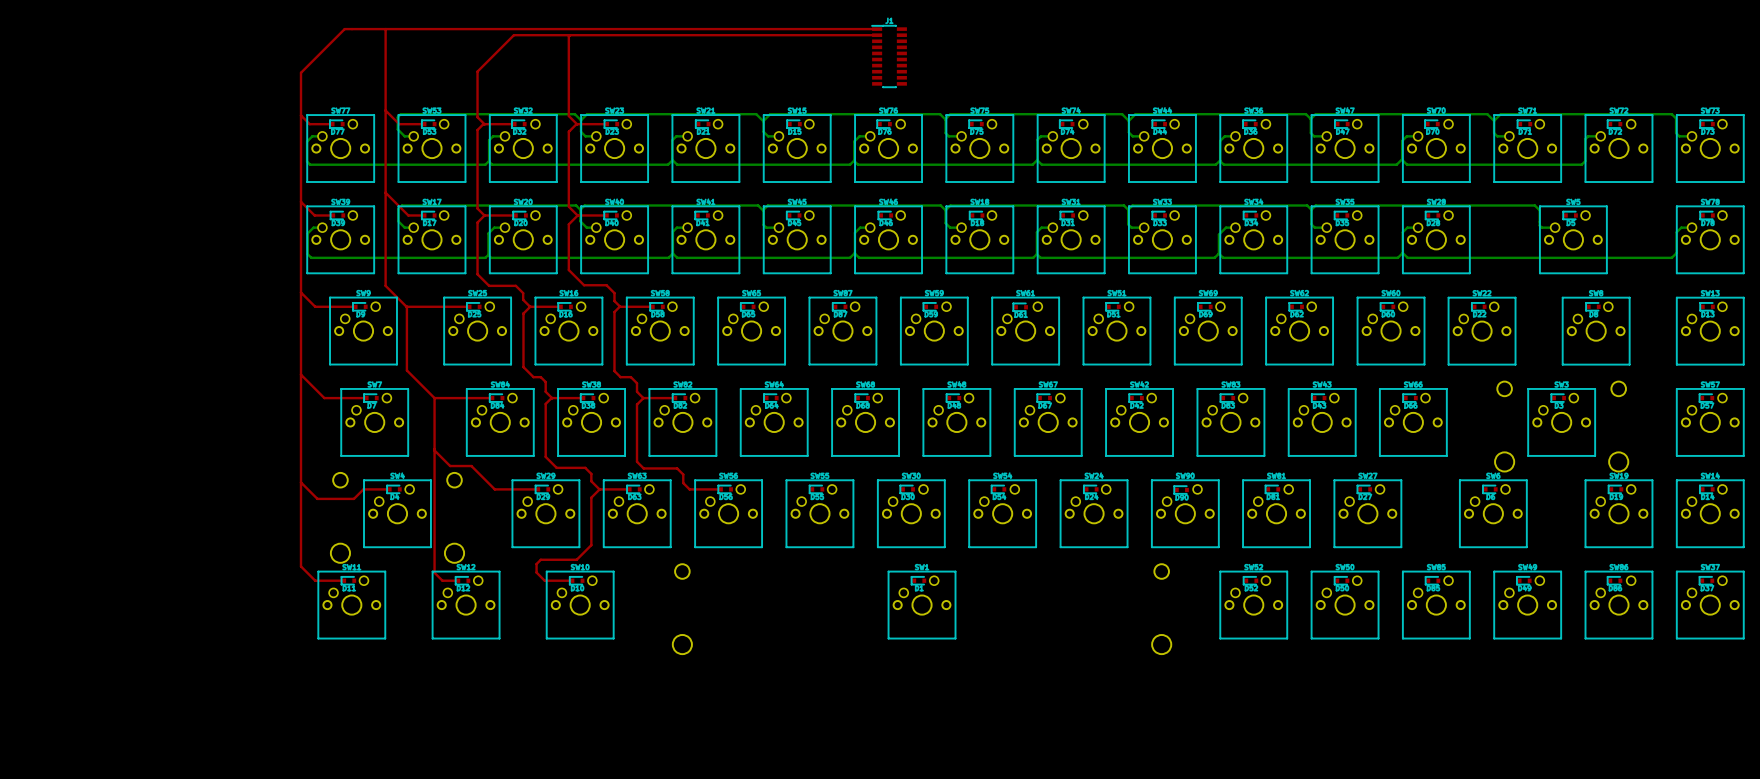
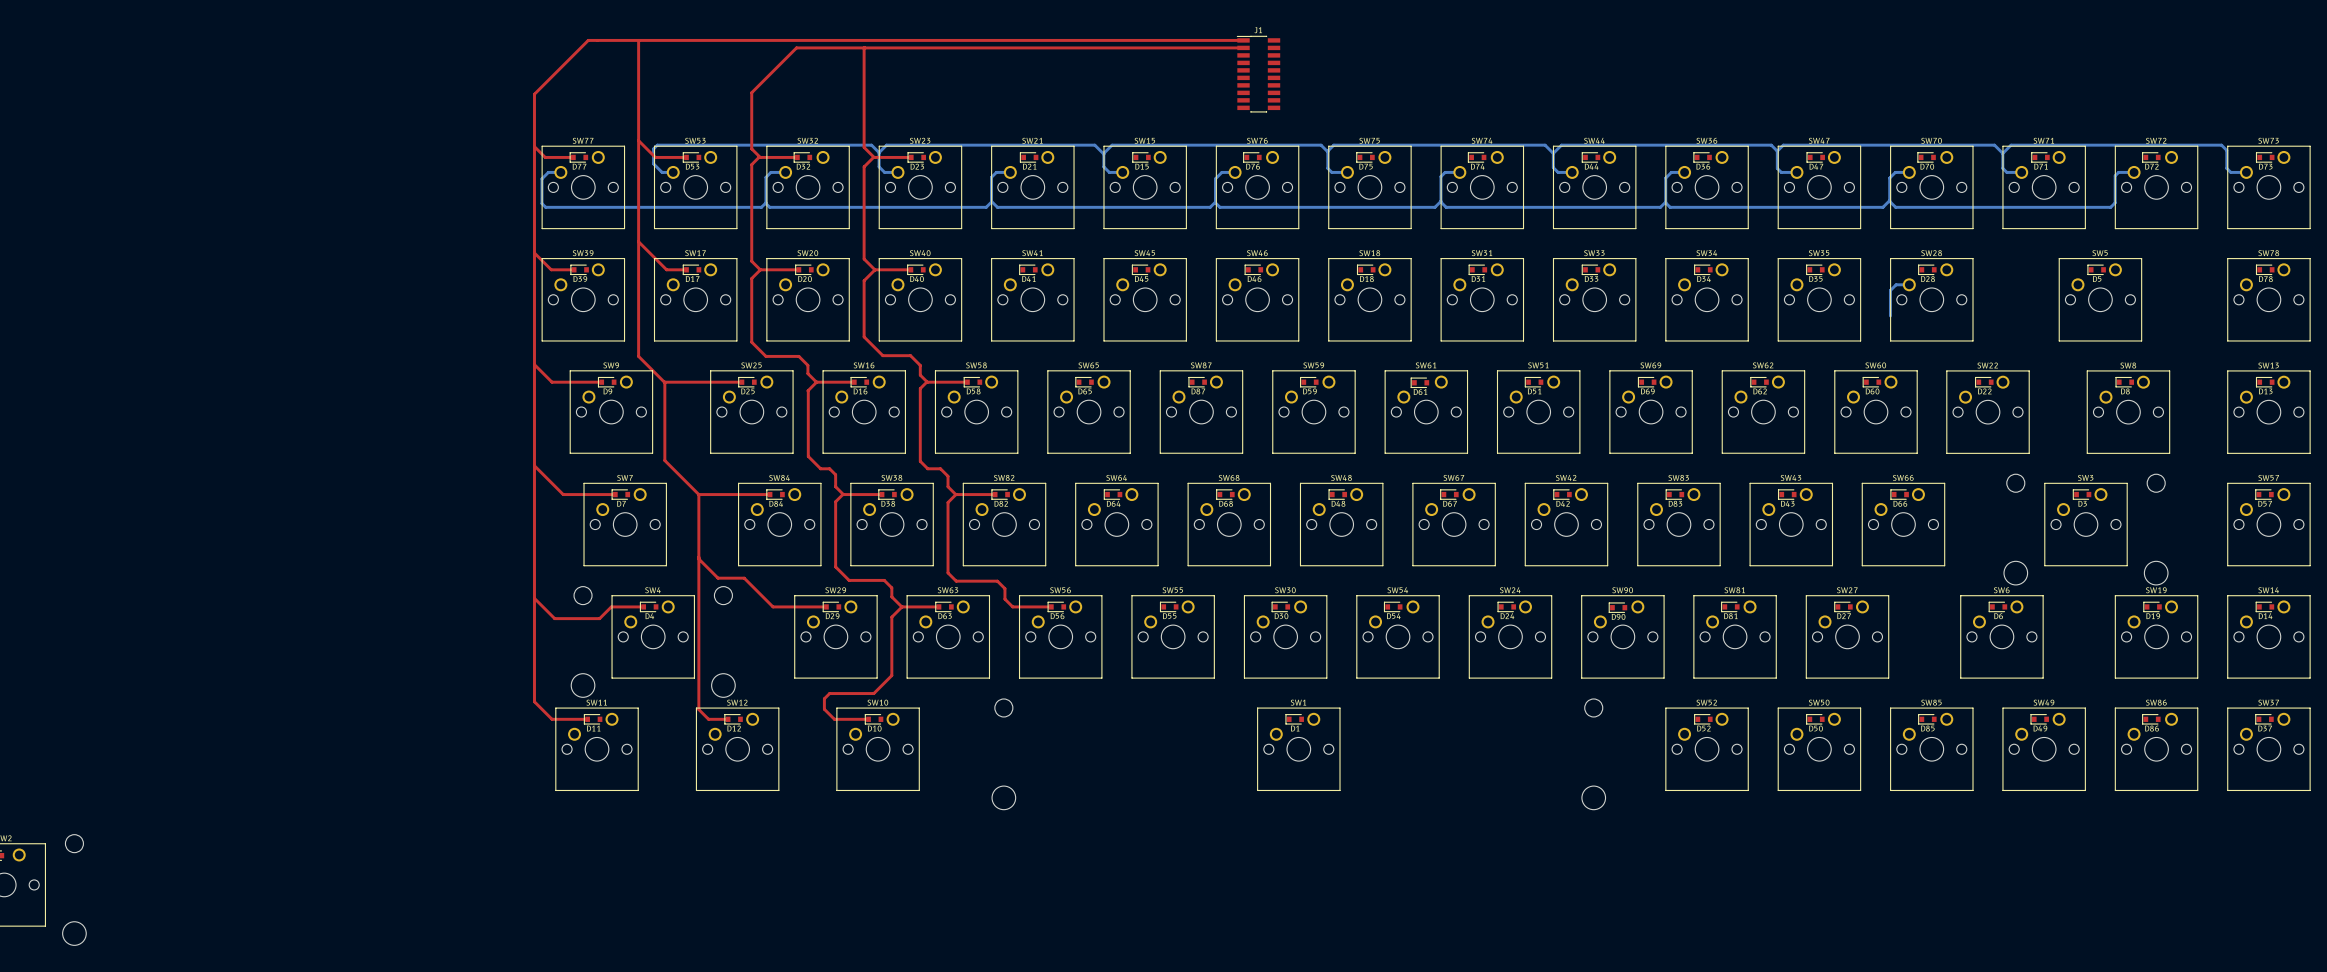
bottom track: (580, 209) (584, 205) (758, 205) (763, 210) -> none
bottom track: (580, 209) (580, 221) (586, 227) (596, 227) -> none
bottom track: (580, 209) (576, 205) (402, 205) (398, 209) (398, 221) (404, 227) (413, 227) -> none
bottom track: (1128, 209) (1132, 205) (1307, 205) (1311, 209) -> none
bottom track: (1128, 209) (1128, 224) (1131, 227) (1144, 227) -> none
bottom track: (1128, 209) (1123, 205) (950, 205) (945, 210) -> none
bottom track: (1311, 209) (1315, 205) (1534, 205) (1539, 210) (1539, 225) (1541, 227) (1555, 227) -> none
bottom track: (1311, 209) (1311, 224) (1314, 227) (1326, 227) -> none
bottom track: (945, 210) (945, 223) (950, 227) (961, 227) -> none
bottom track: (945, 210) (940, 205) (767, 205) (763, 209) (763, 224) (766, 227) (778, 227) -> none
bottom track: (322, 227) (313, 227) (307, 233) (307, 254) (311, 257) (485, 257) (488, 254) -> none
bottom track: (505, 227) (494, 227) (488, 233) (488, 255) (490, 257) (668, 257) (672, 253) -> none
bottom track: (687, 227) (676, 227) (672, 231) (672, 253) -> none
bottom track: (870, 227) (860, 227) (854, 232) (854, 253) (859, 257) (1033, 257) (1036, 254) -> none
bottom track: (1052, 227) (1041, 227) (1036, 232) (1036, 254) -> none
bottom track: (1235, 227) (1226, 227) (1218, 234) (1218, 253) -> none
bottom track: (1692, 227) (1681, 227) (1676, 232) (1676, 252) (1671, 257) (1407, 257) (1402, 252) (1397, 257) (1223, 257) (1218, 253) -> none
bottom track: (854, 252) (850, 257) (677, 257) (672, 253) -> none
bottom track: (1218, 253) (1214, 257) (1040, 257) (1036, 254) -> none

